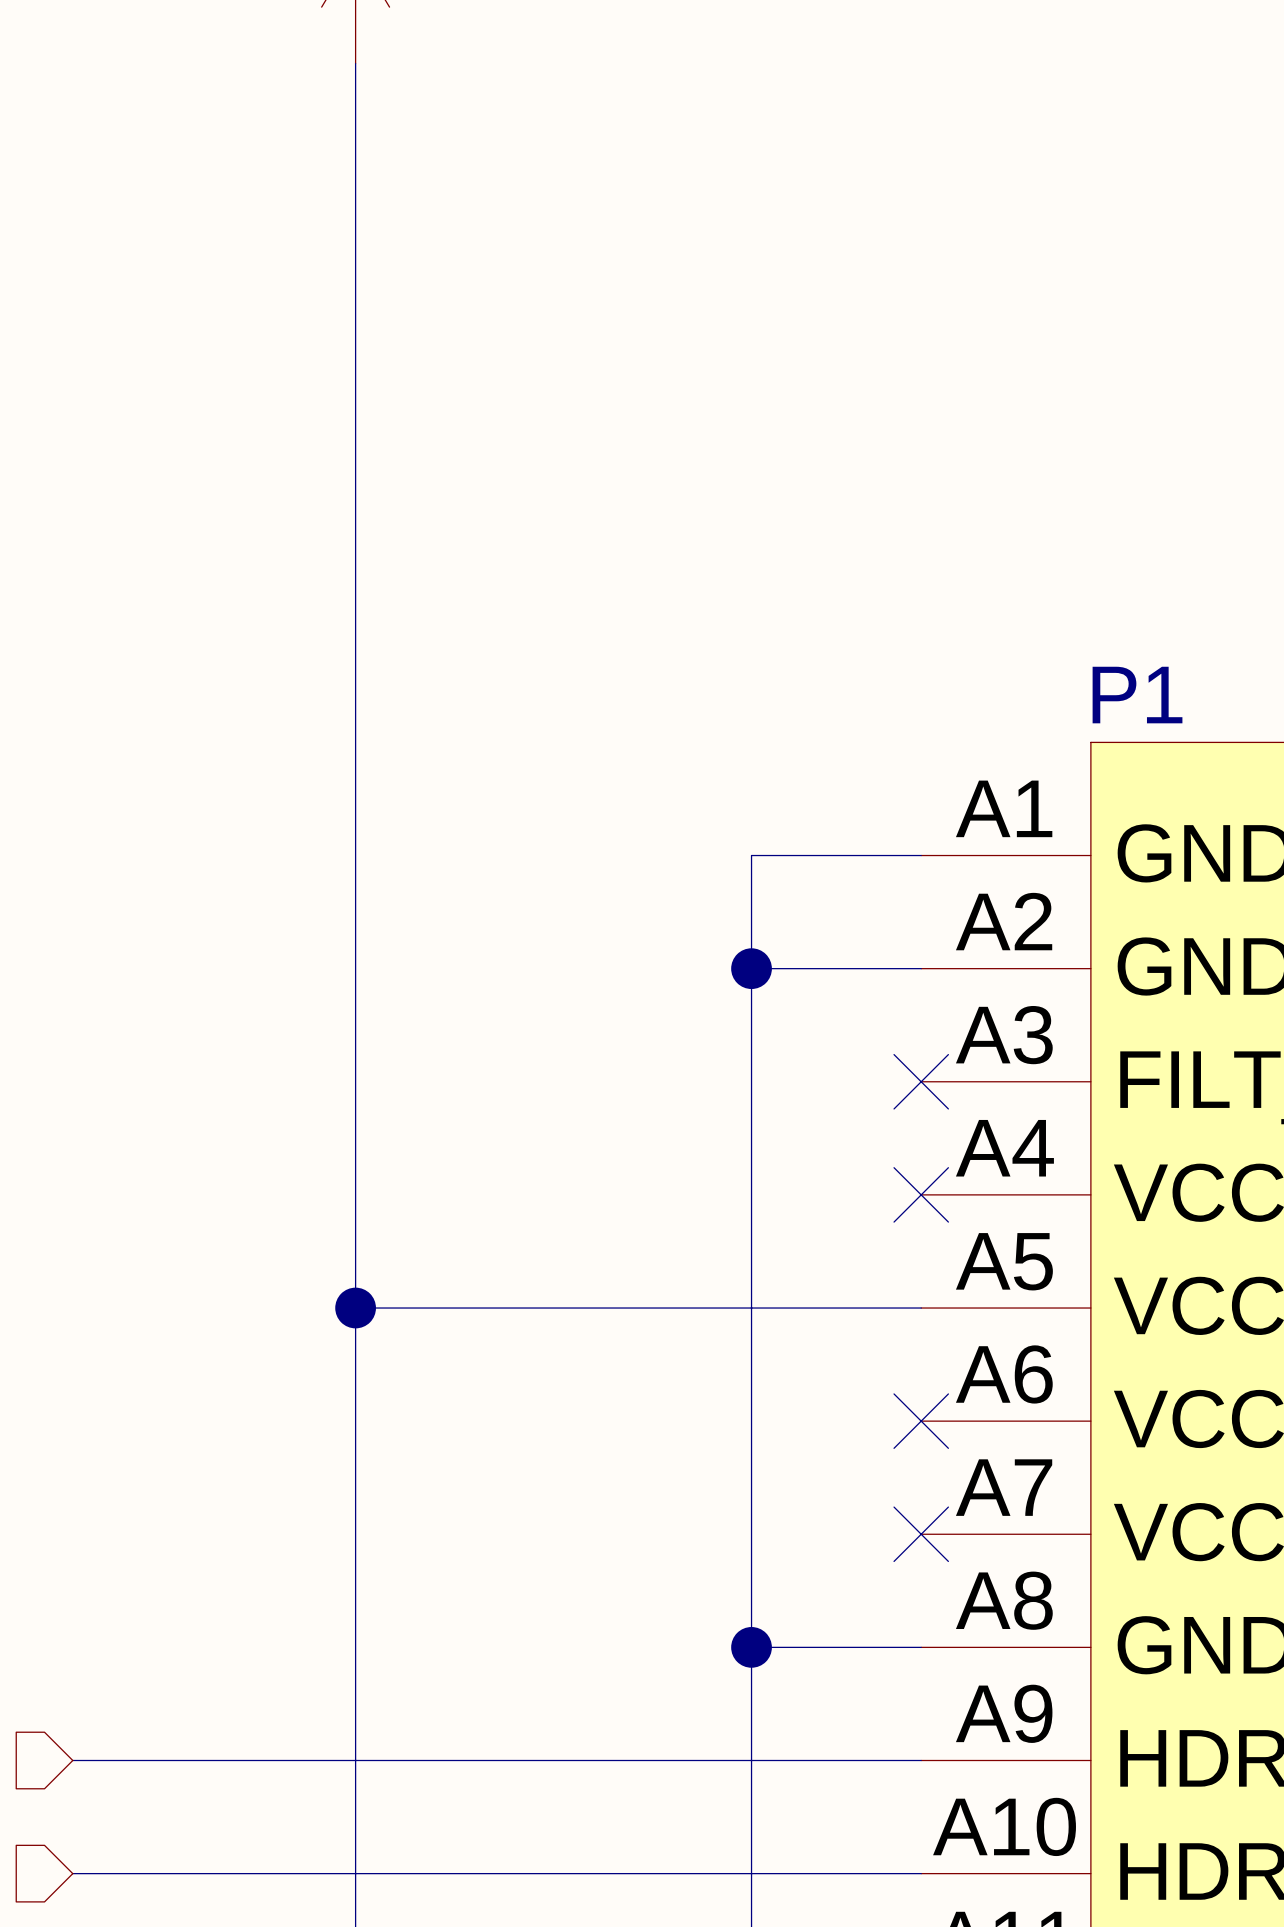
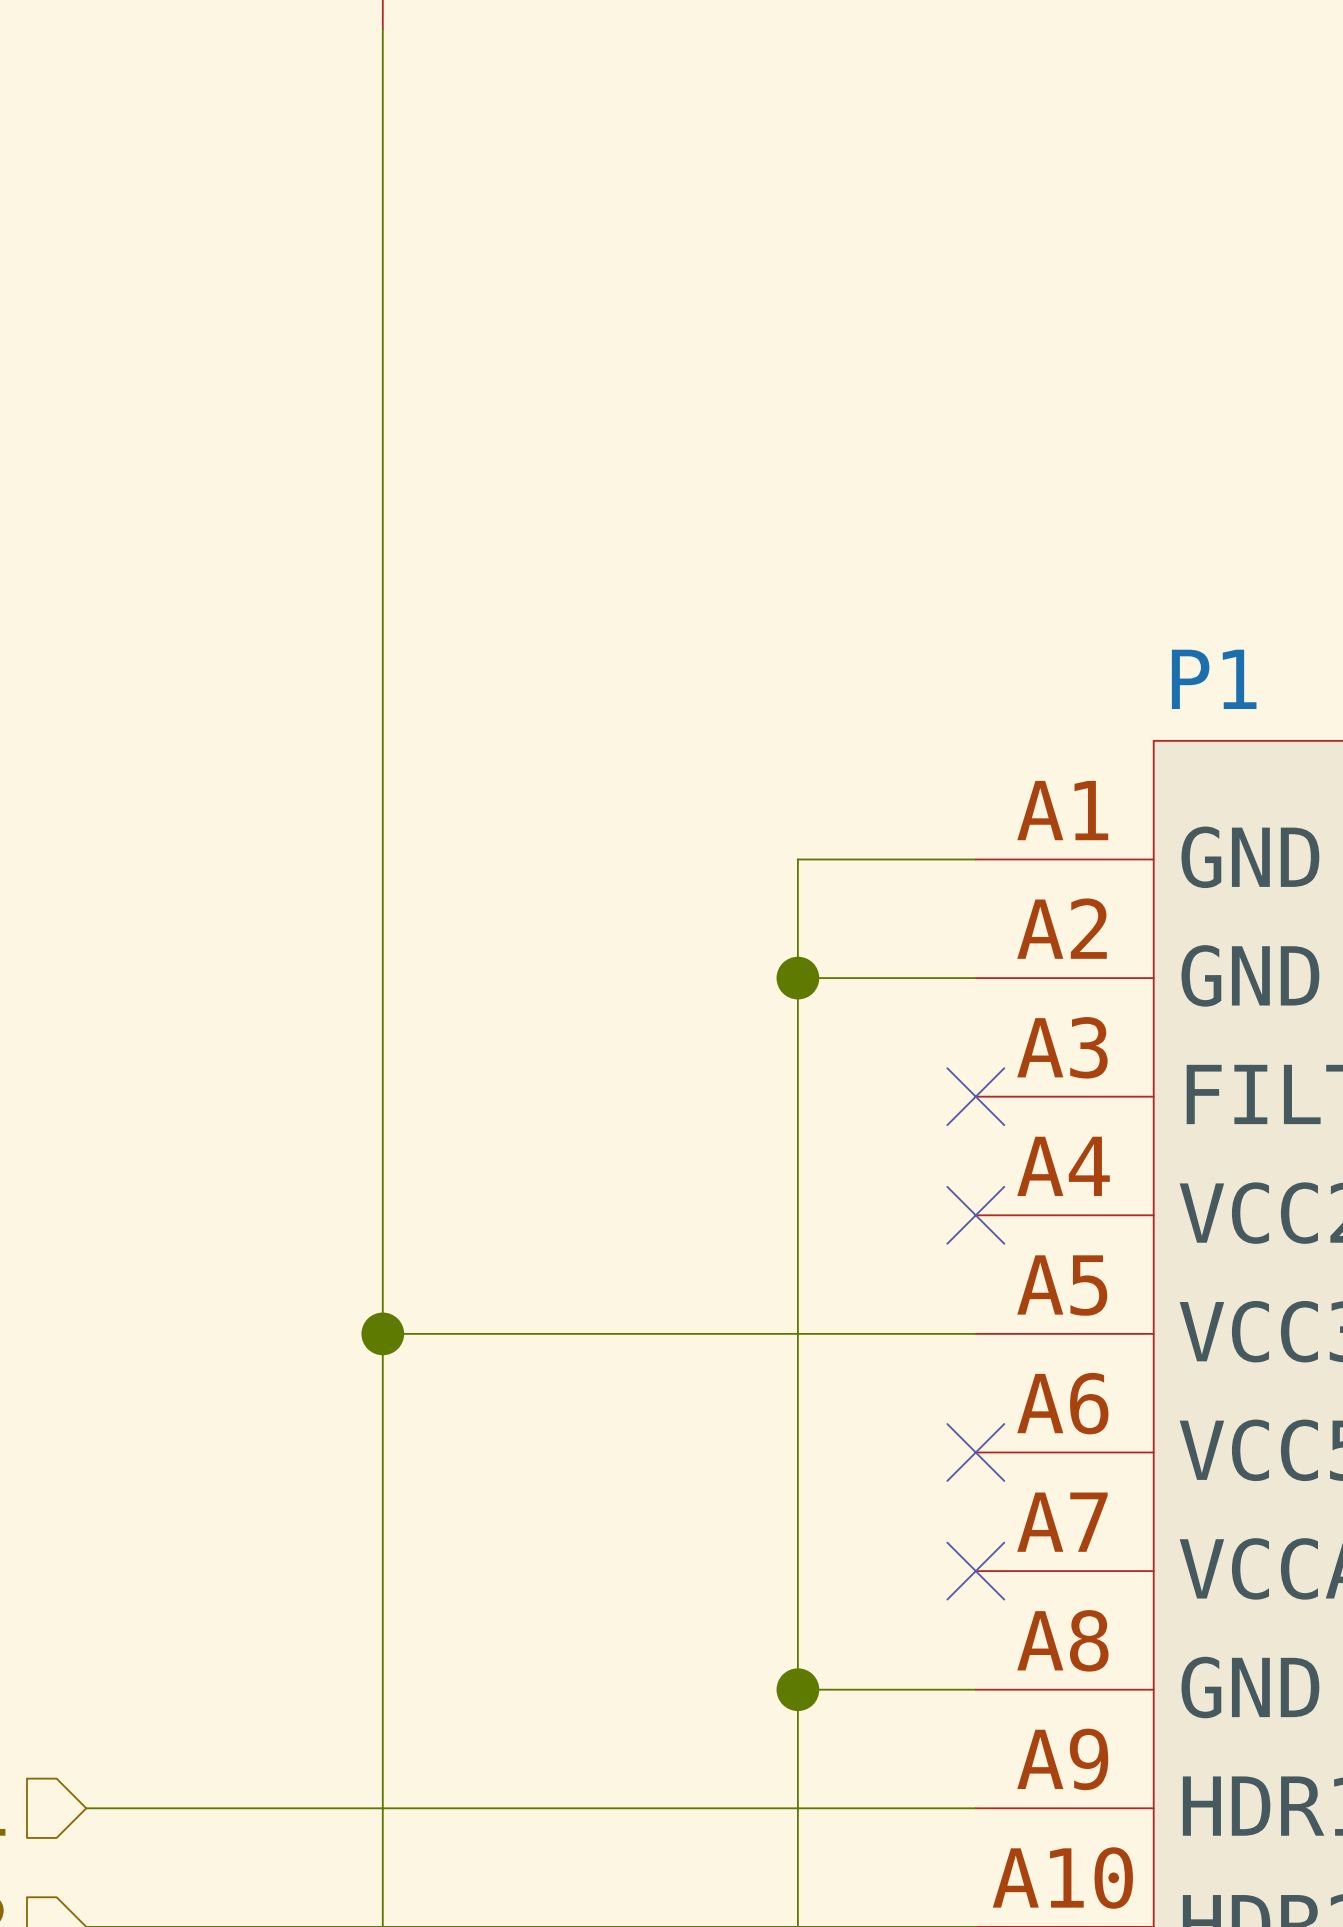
P1 name position: P1 (1137, 695) -> P1 (1214, 679)

